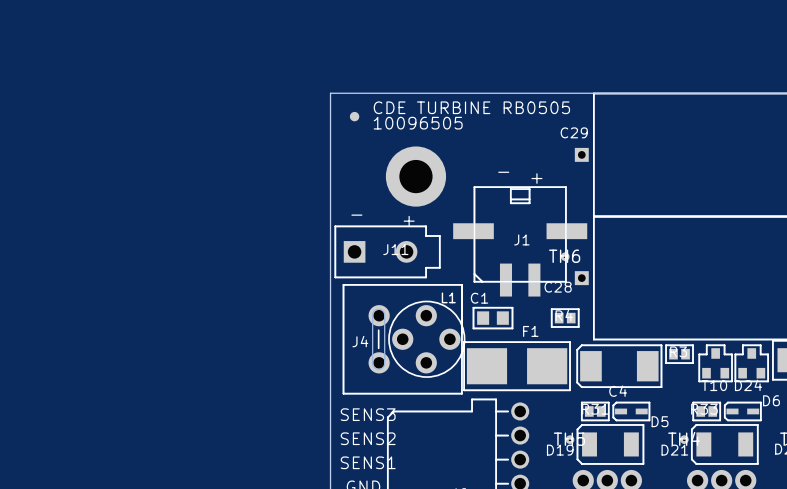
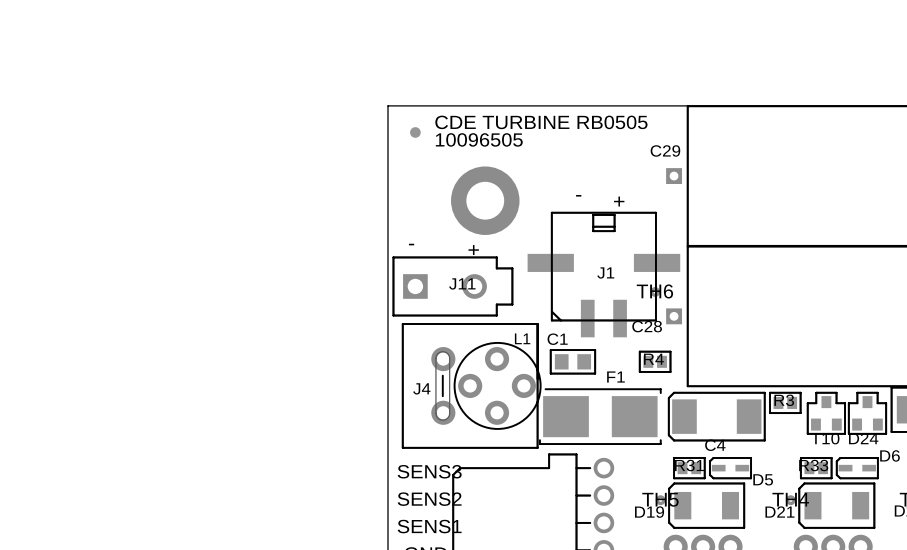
F1 footprint: [463, 341, 571, 392] -> [538, 388, 662, 445]

